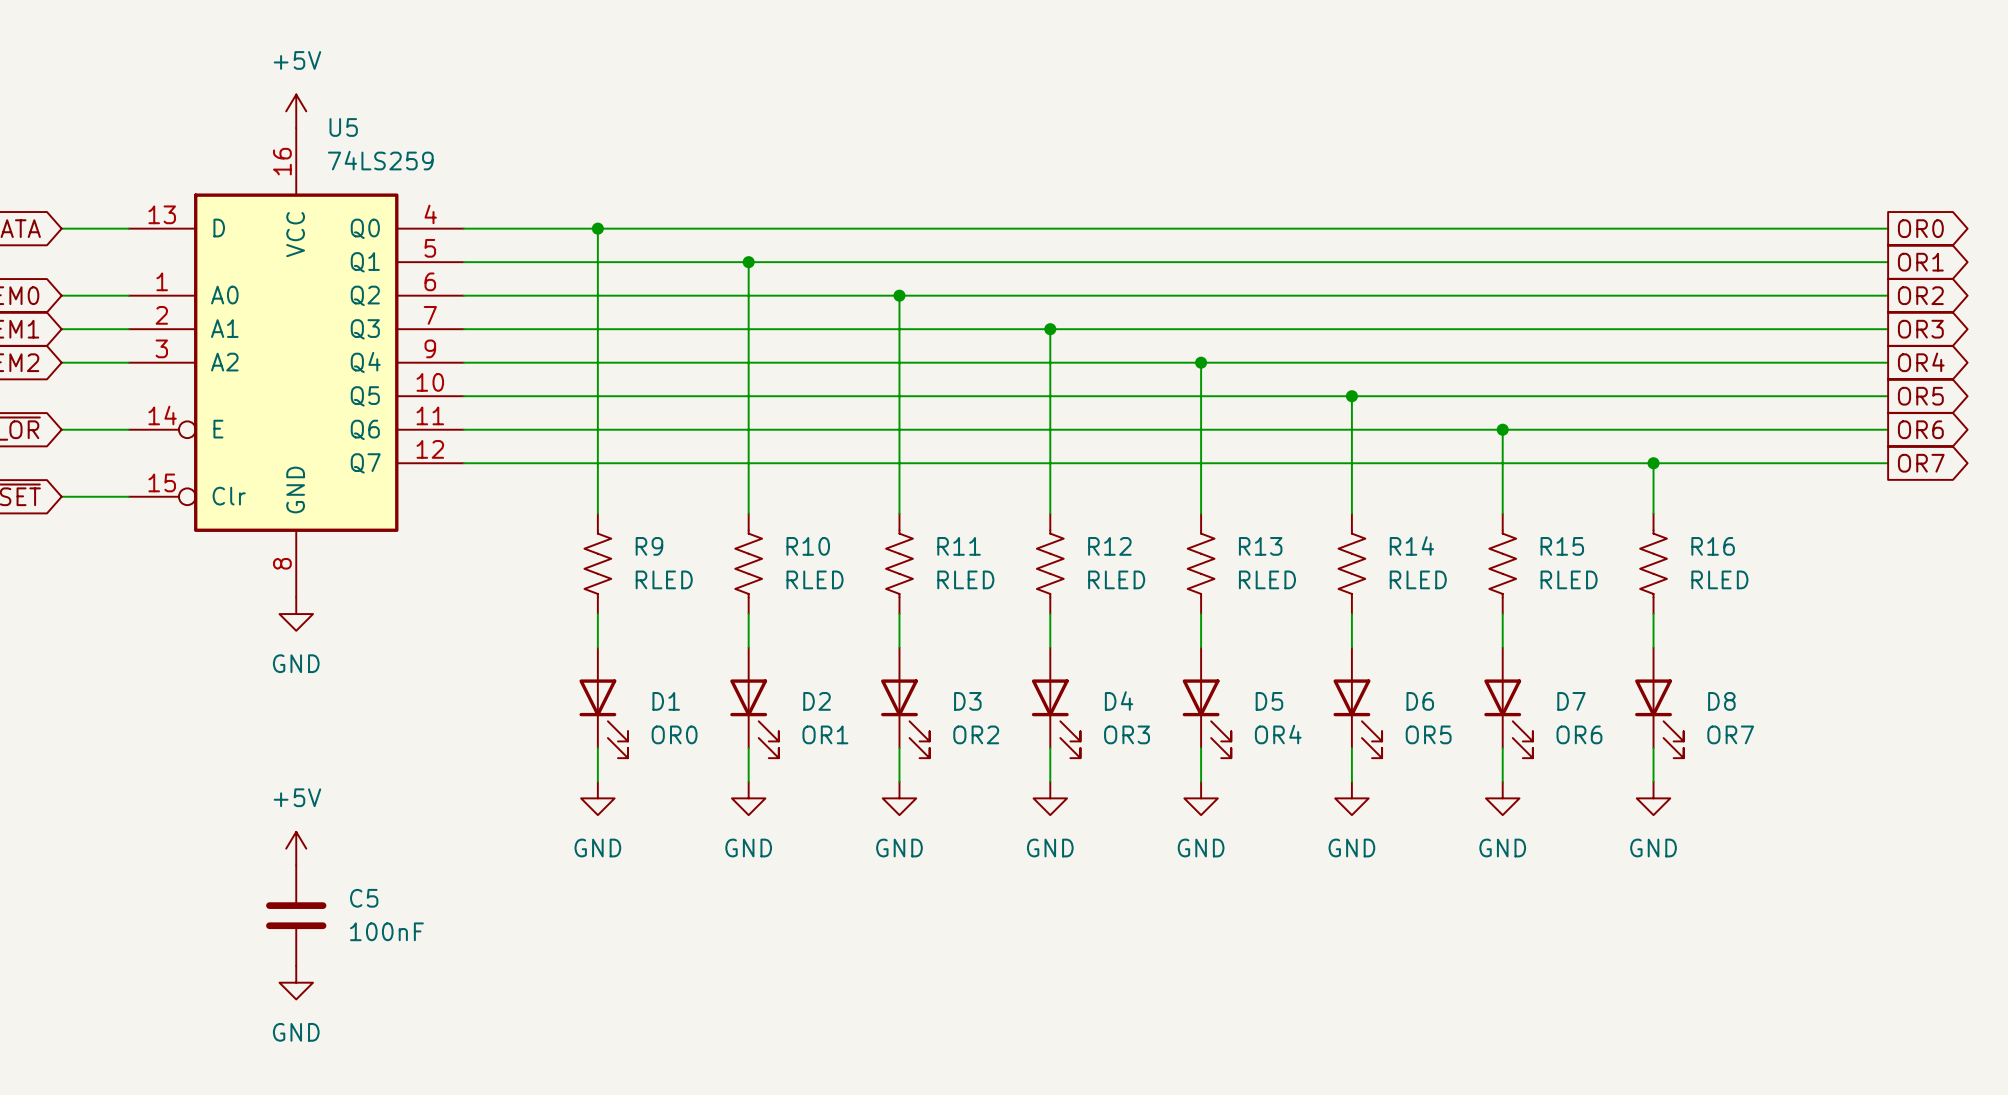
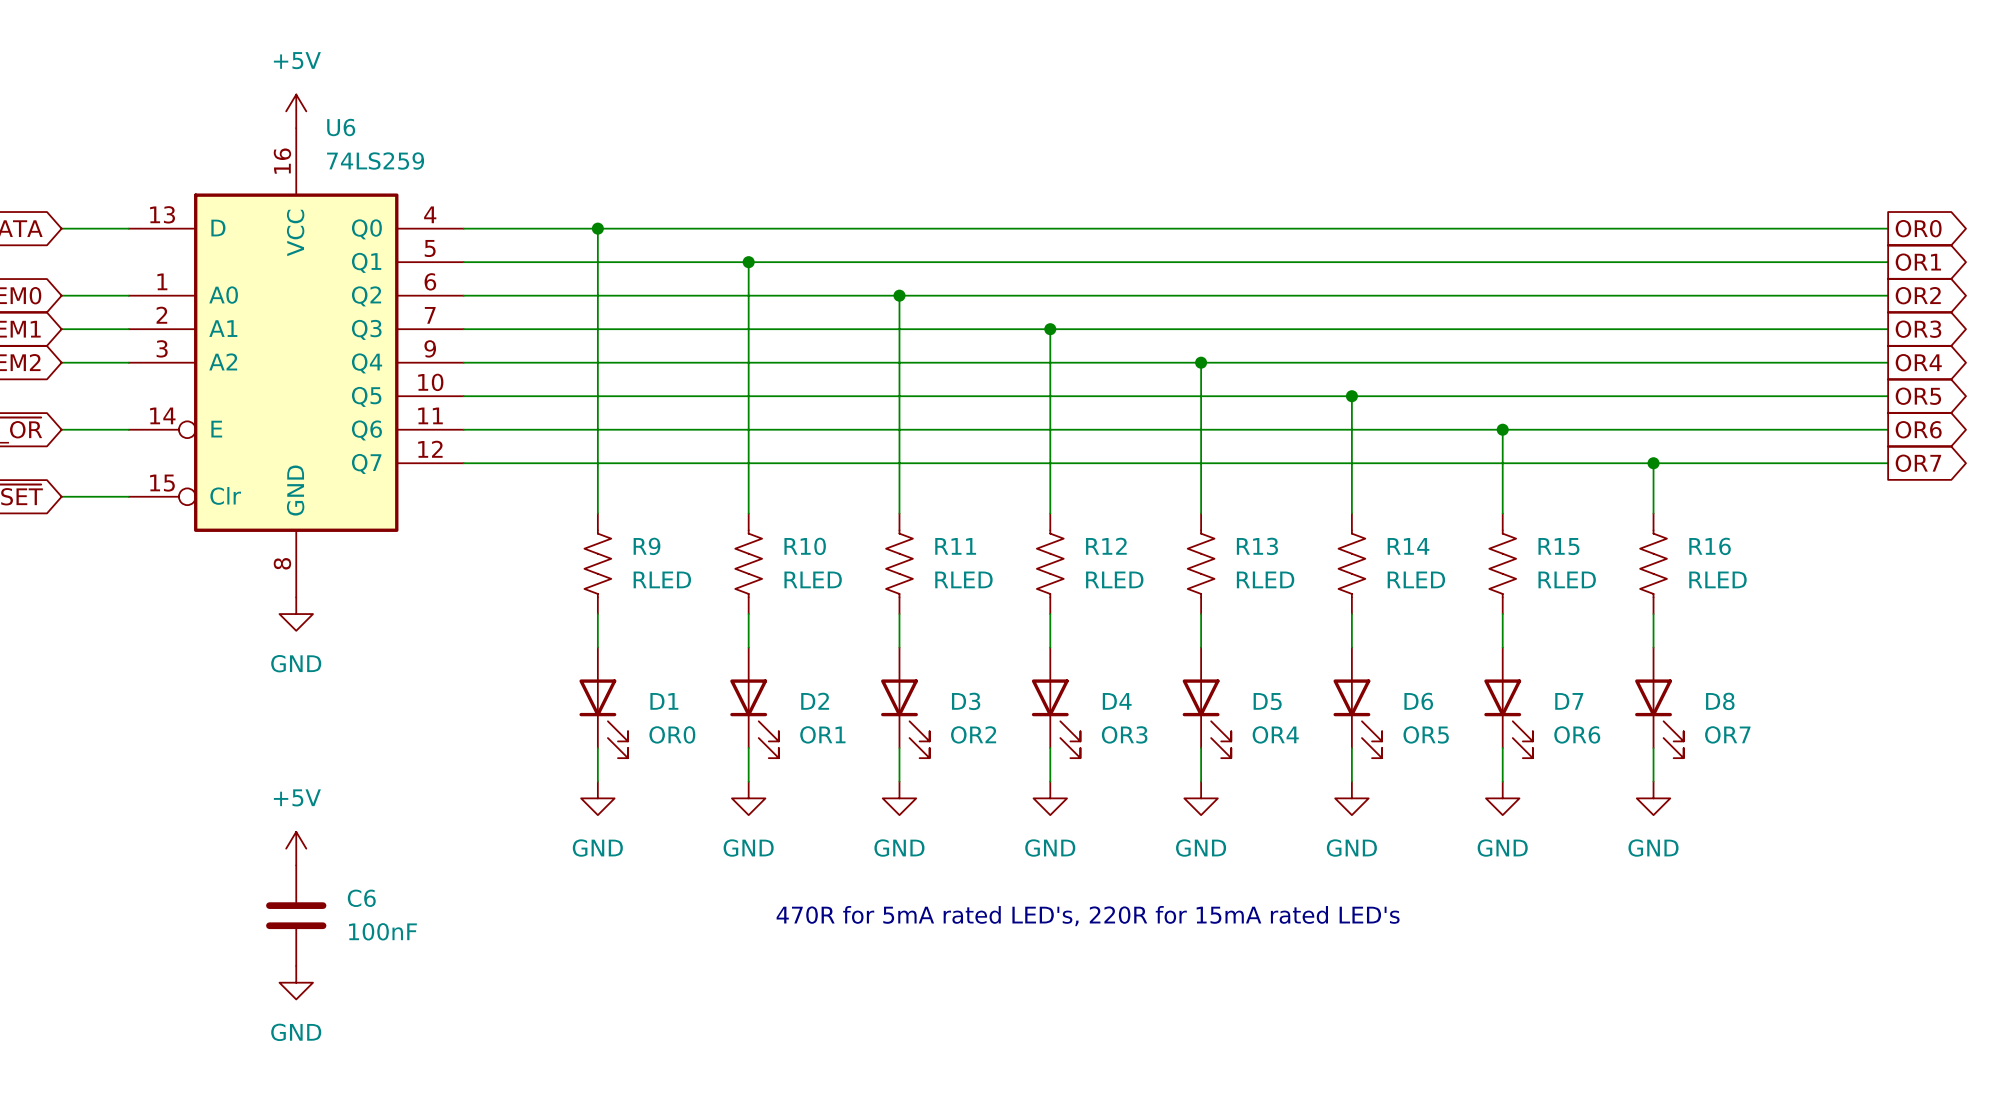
U5 name: U5 (343, 127) -> U6 (341, 127)
C5 name: C5 (364, 898) -> C6 (361, 898)
text: none -> 470R for 5mA rated LED's, 220R for 15mA rated LED's (1088, 916)

